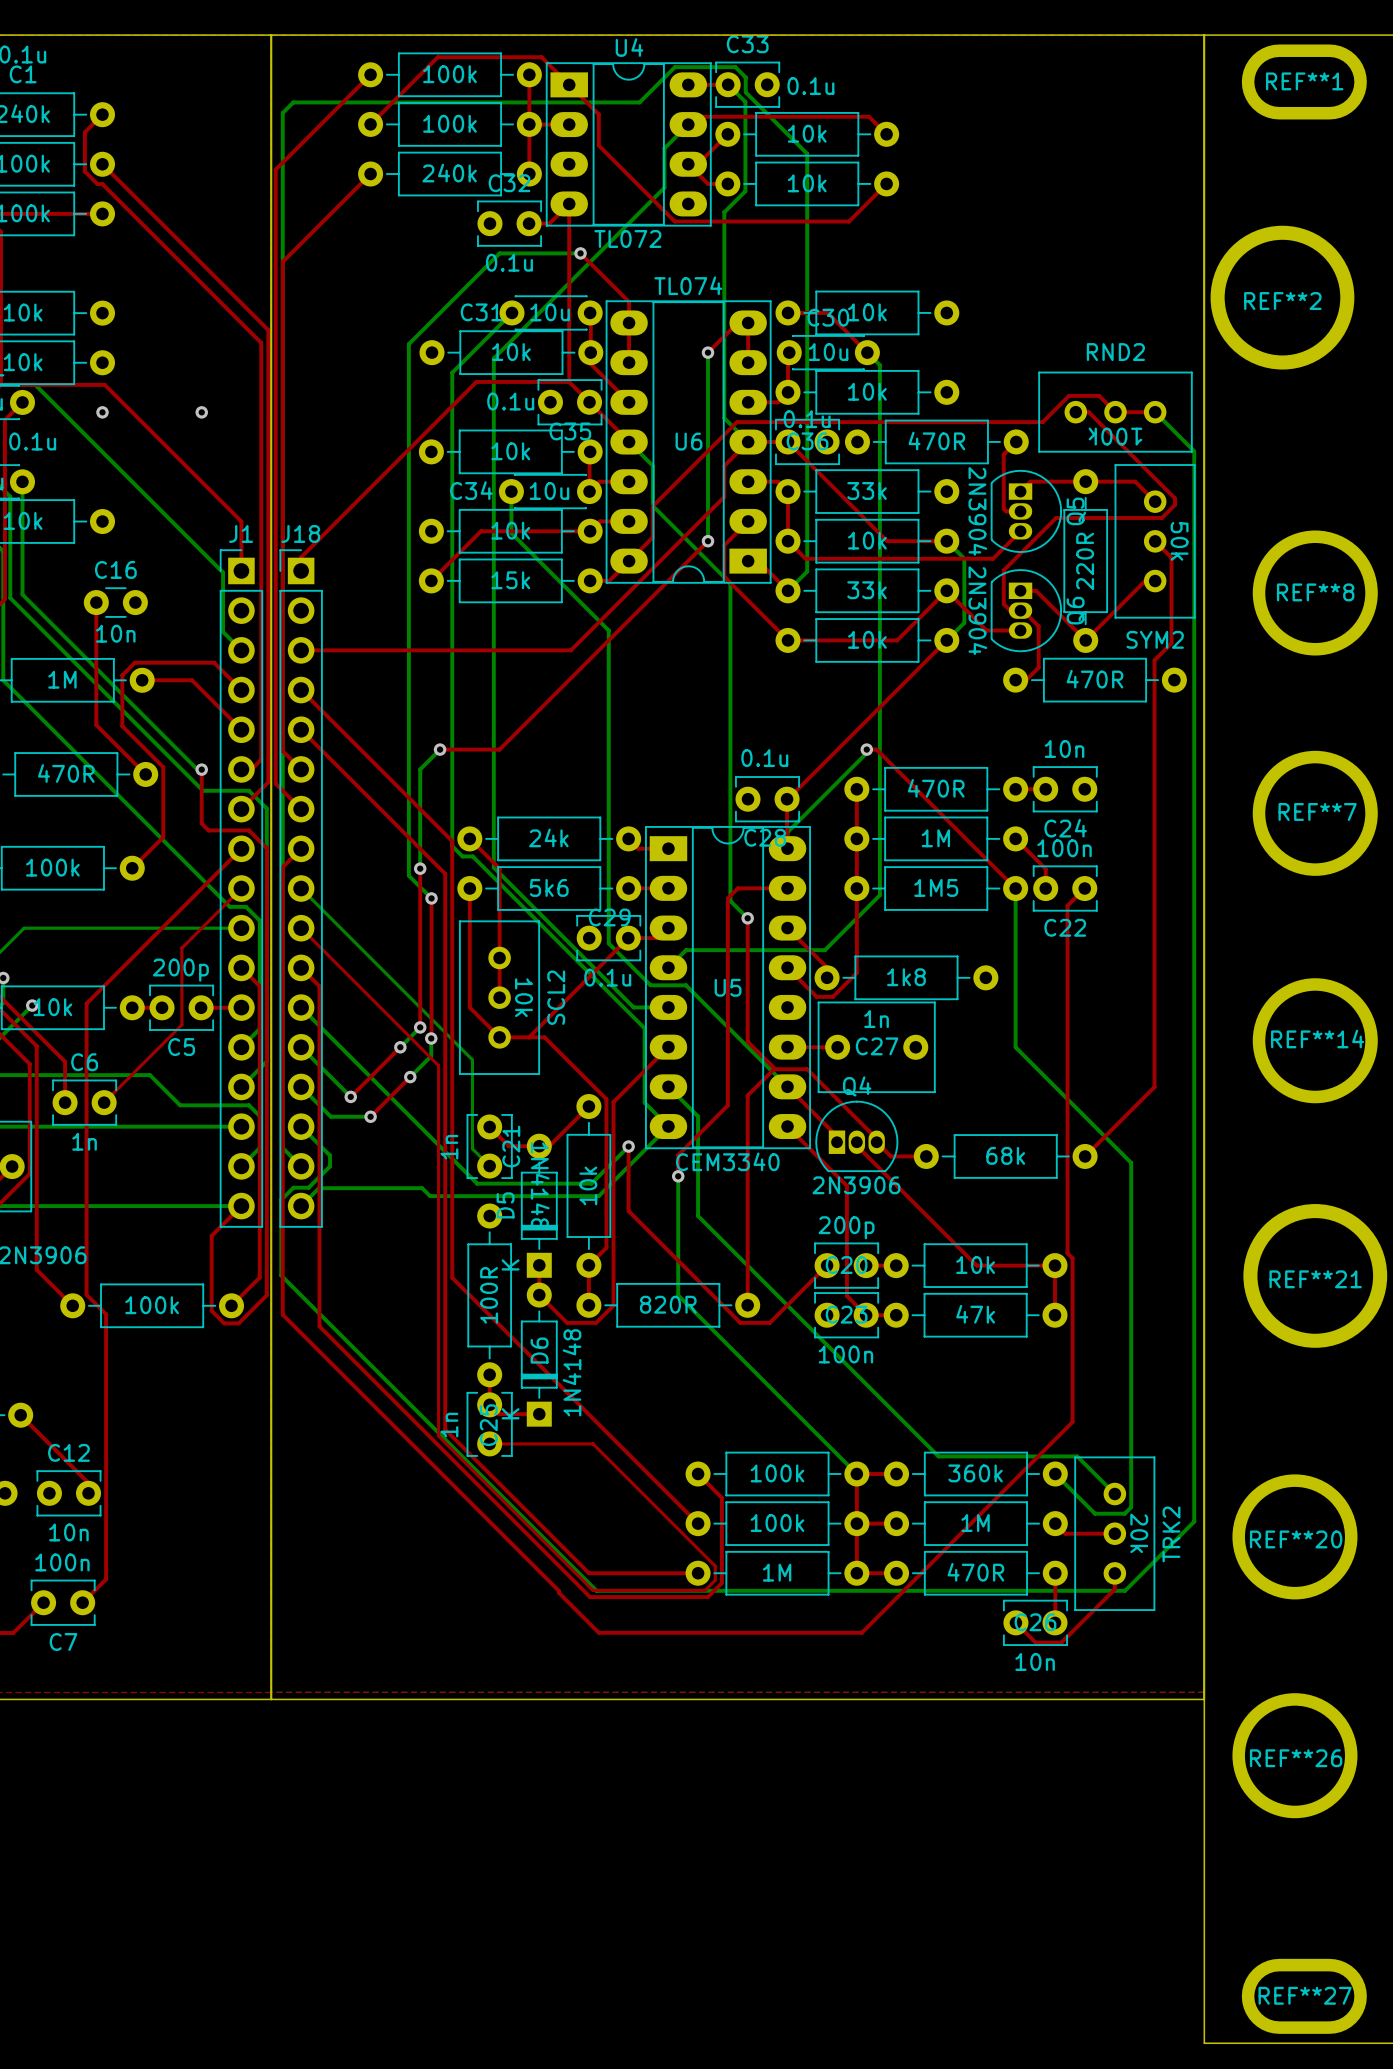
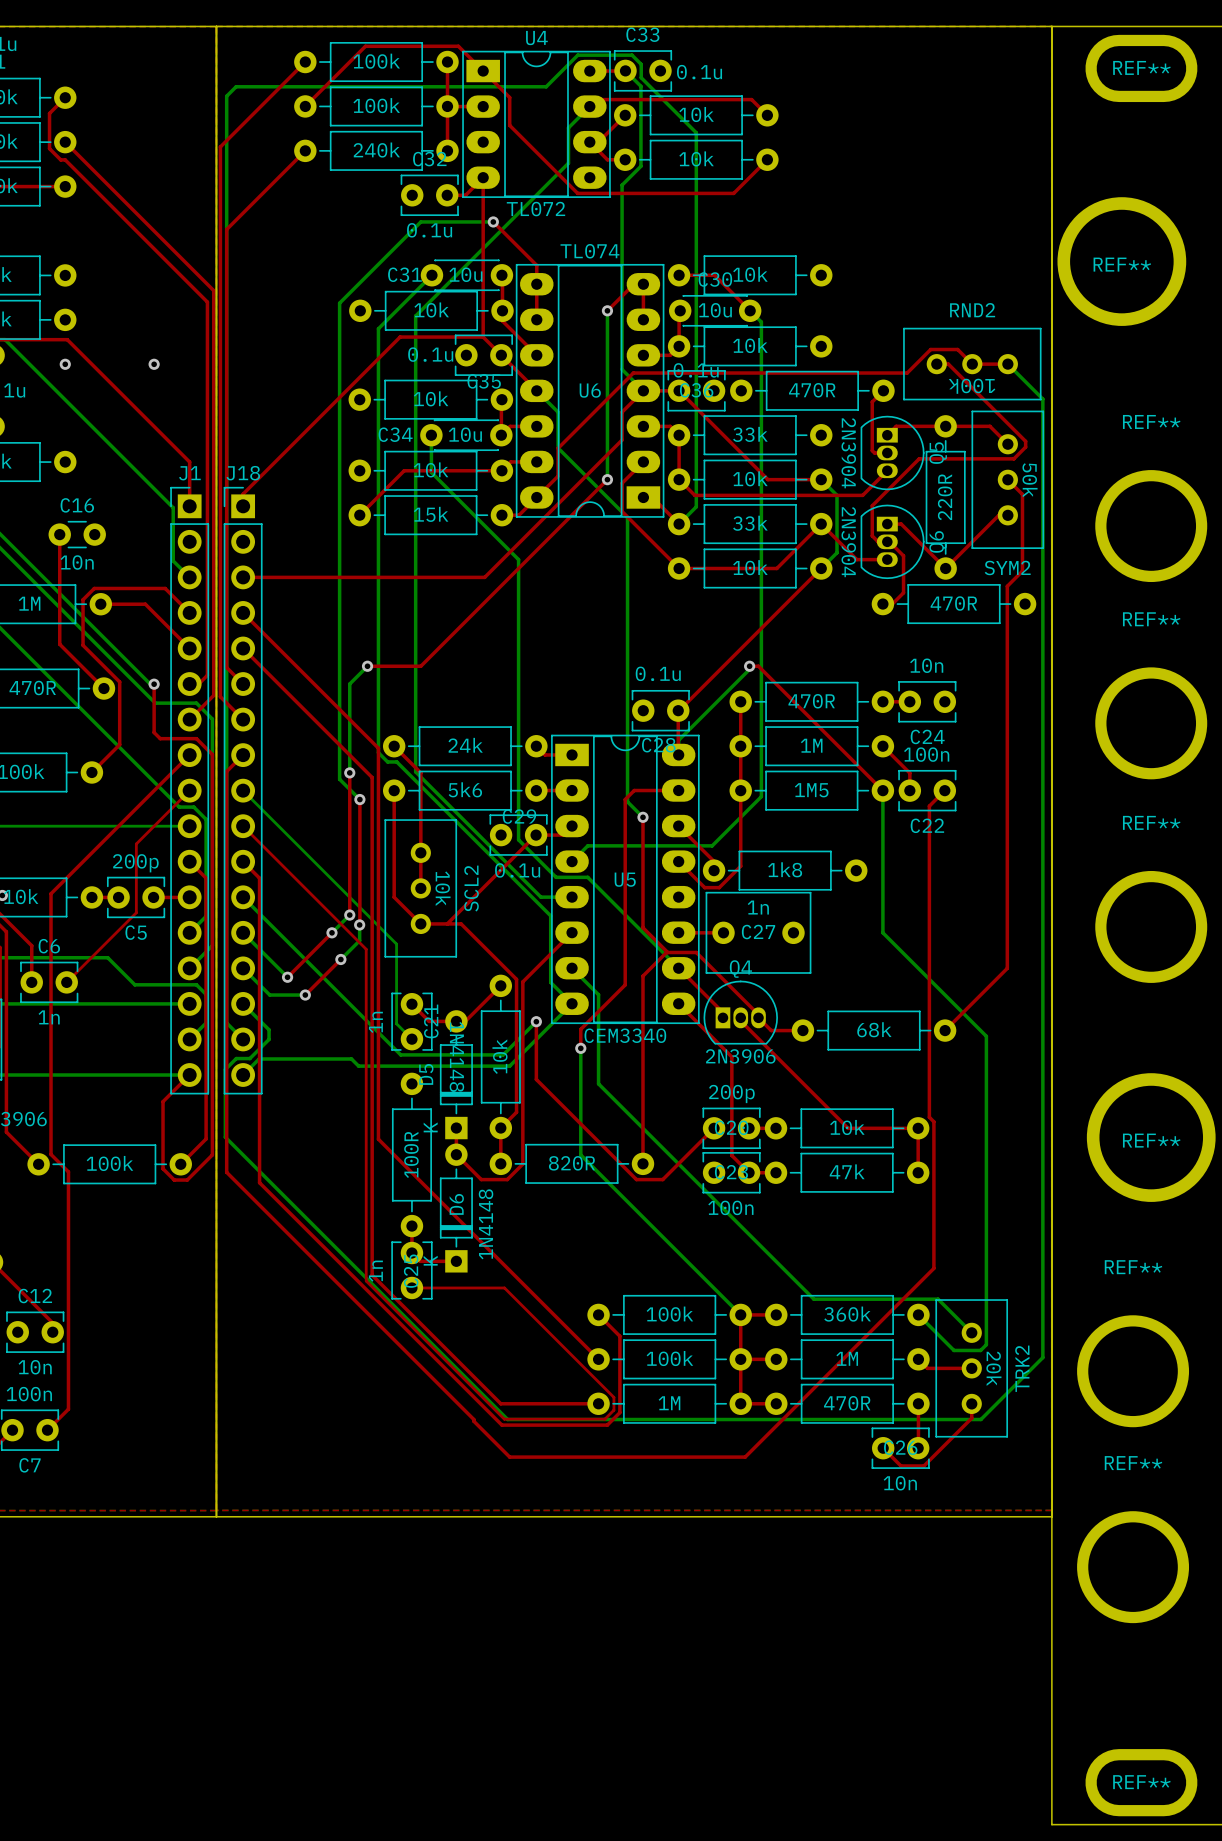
REF**1 name: REF**1 (1304, 81) -> REF** (1141, 67)
REF**2 name: REF**2 (1282, 301) -> REF** (1122, 264)
REF**8 name: REF**8 (1315, 592) -> REF** (1151, 421)
REF**7 name: REF**7 (1317, 811) -> REF** (1151, 619)
REF**14 name: REF**14 (1317, 1038) -> REF** (1151, 822)
REF**21 name: REF**21 (1315, 1279) -> REF** (1151, 1140)
REF**20 name: REF**20 (1296, 1539) -> REF** (1133, 1267)
REF**26 name: REF**26 (1296, 1758) -> REF** (1133, 1463)
REF**27 name: REF**27 (1305, 1995) -> REF** (1141, 1782)

